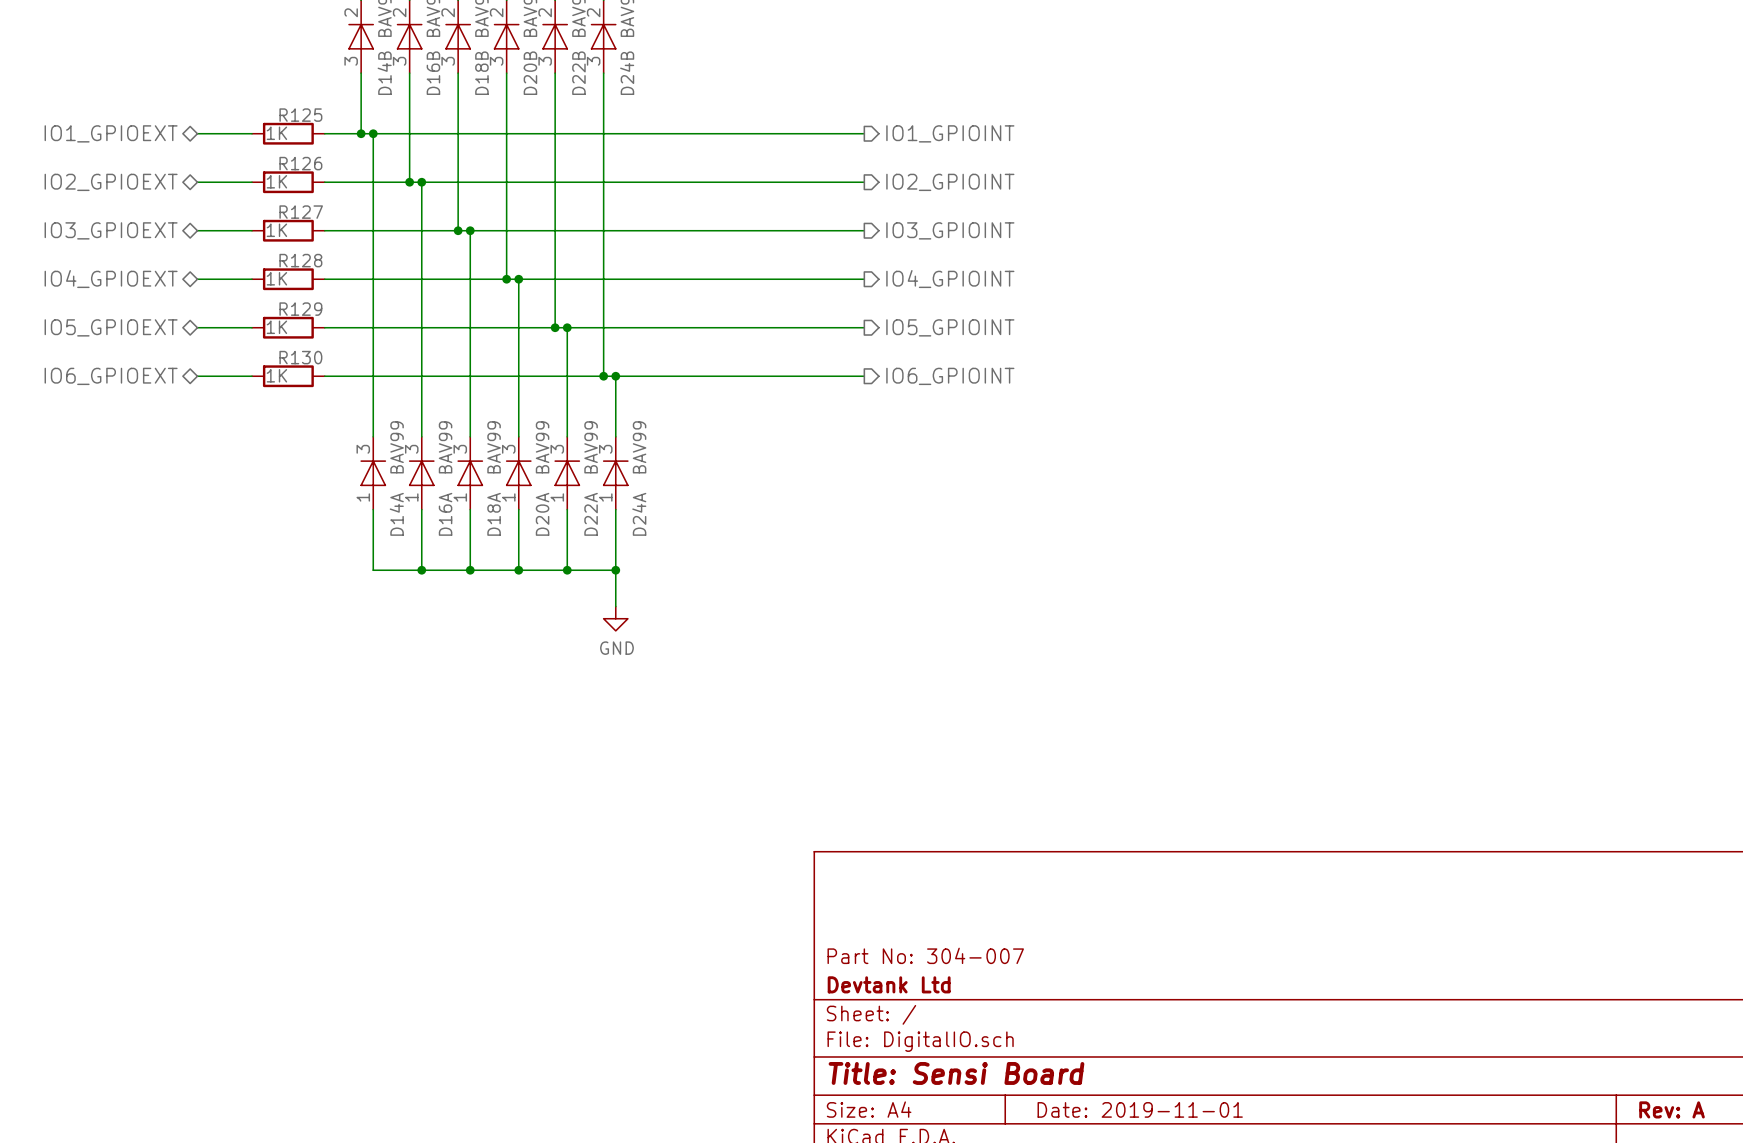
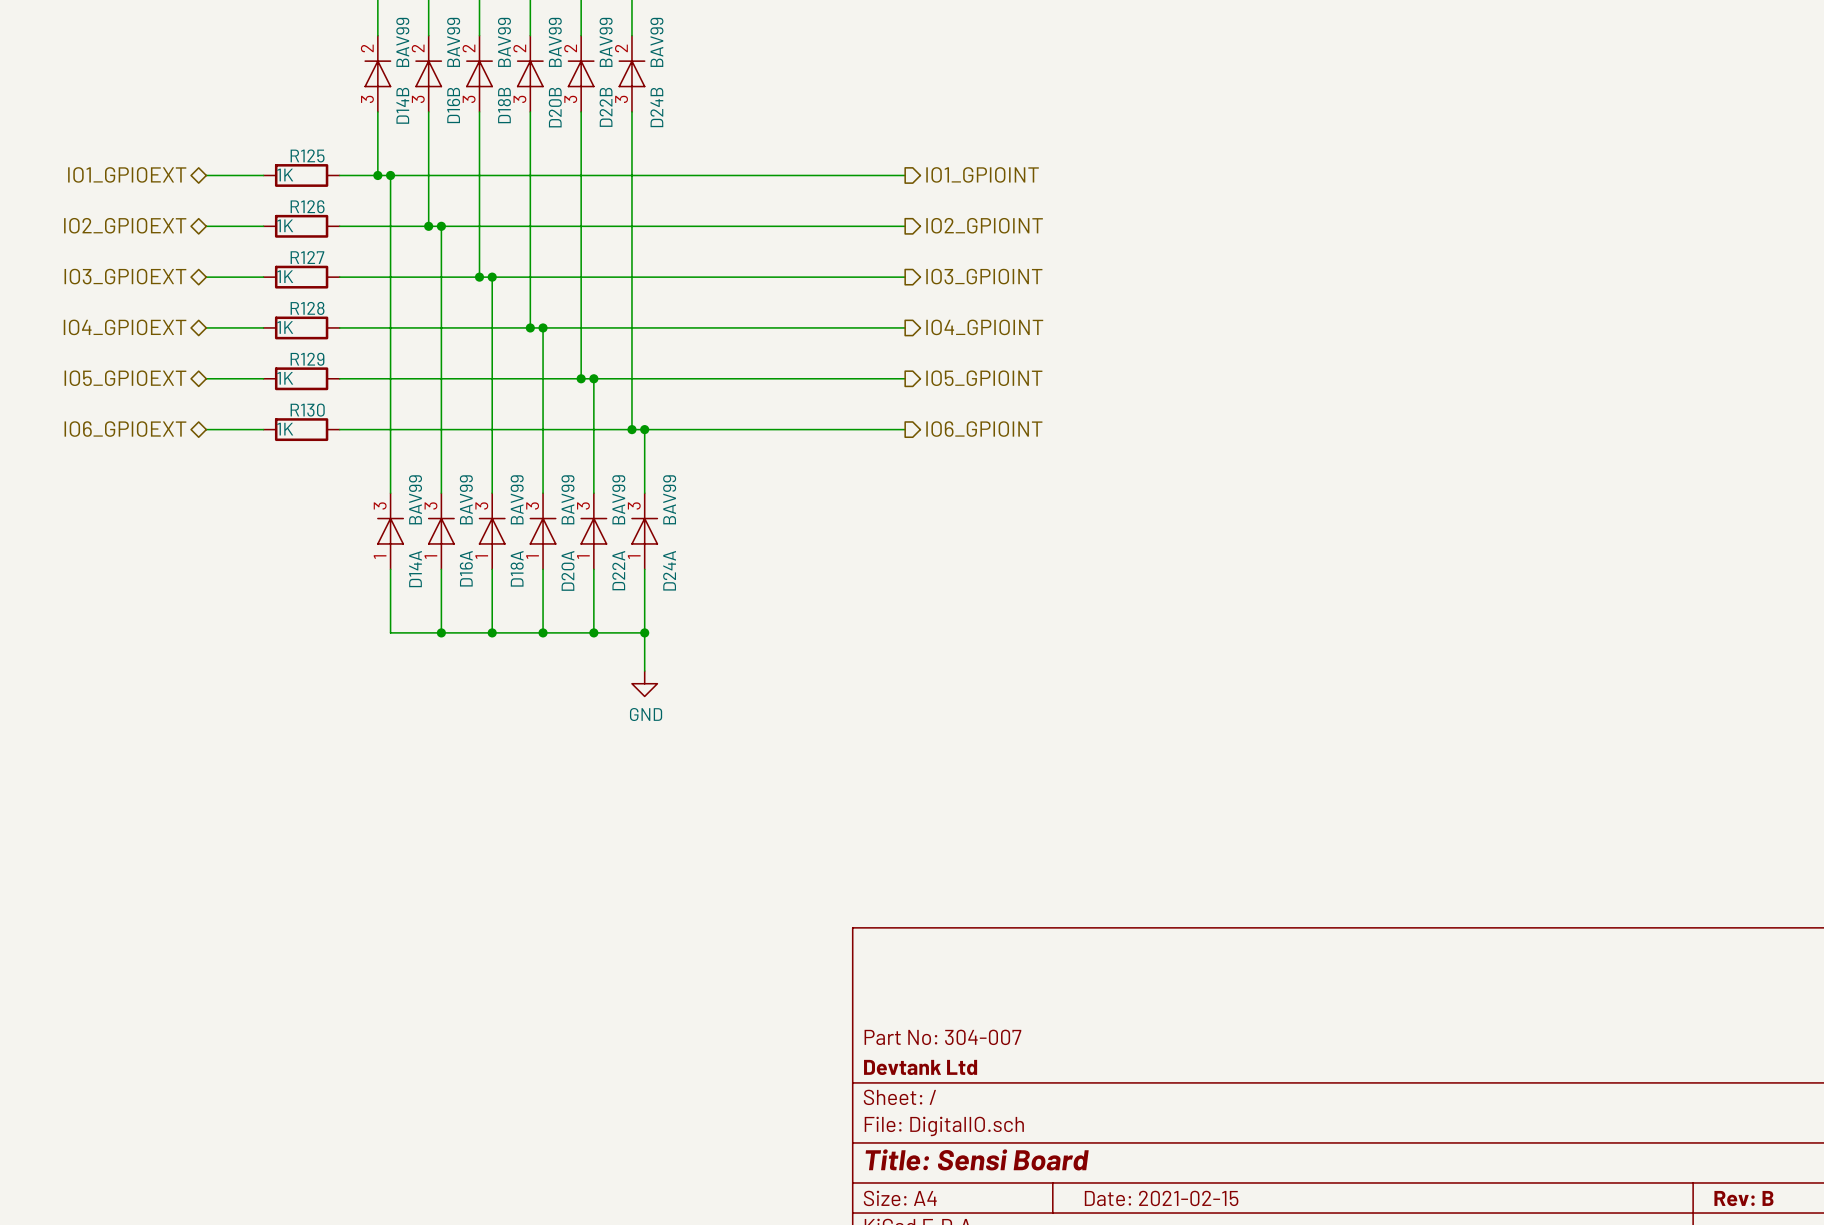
title block: Date: 2019-11-01 (1140, 1109) -> Date: 2021-02-15 (1161, 1198)
title block: Rev: A (1672, 1109) -> Rev: B (1743, 1198)

